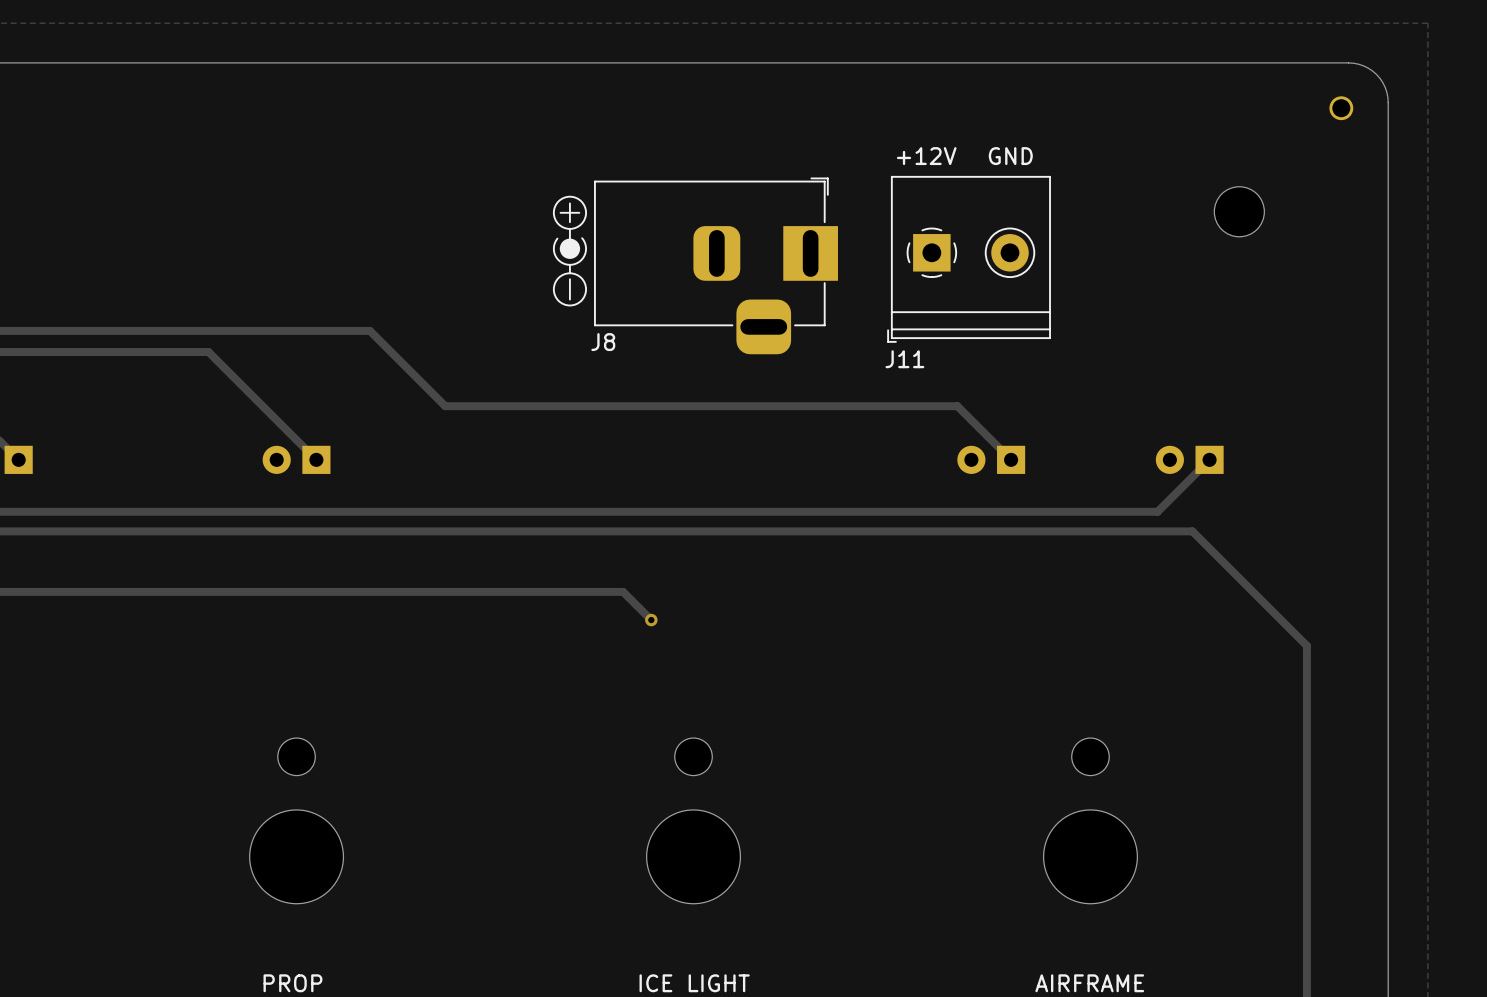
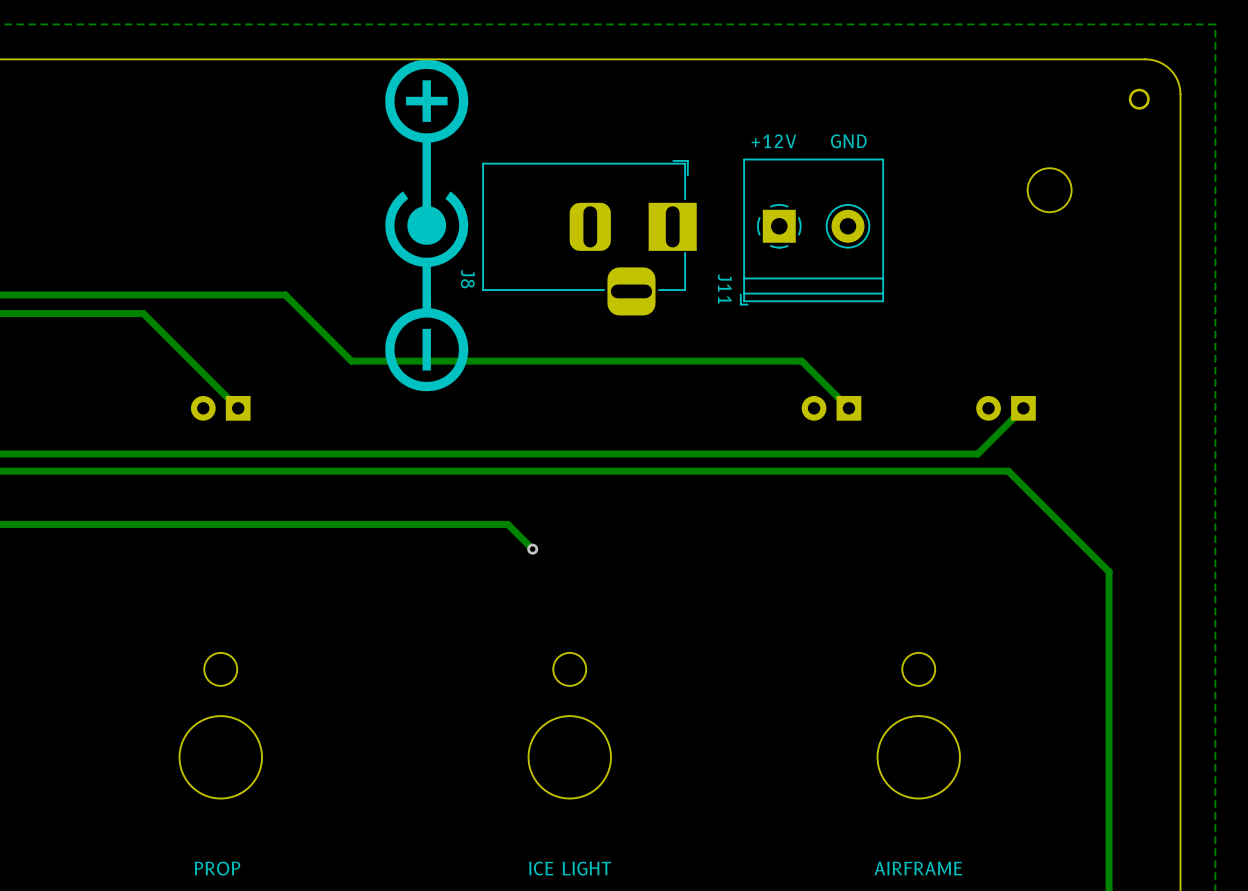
J8 footprint: [552, 177, 838, 355] -> [385, 59, 697, 392]
J11 name rotation: 0° (904, 359) -> 90° clockwise (724, 289)

